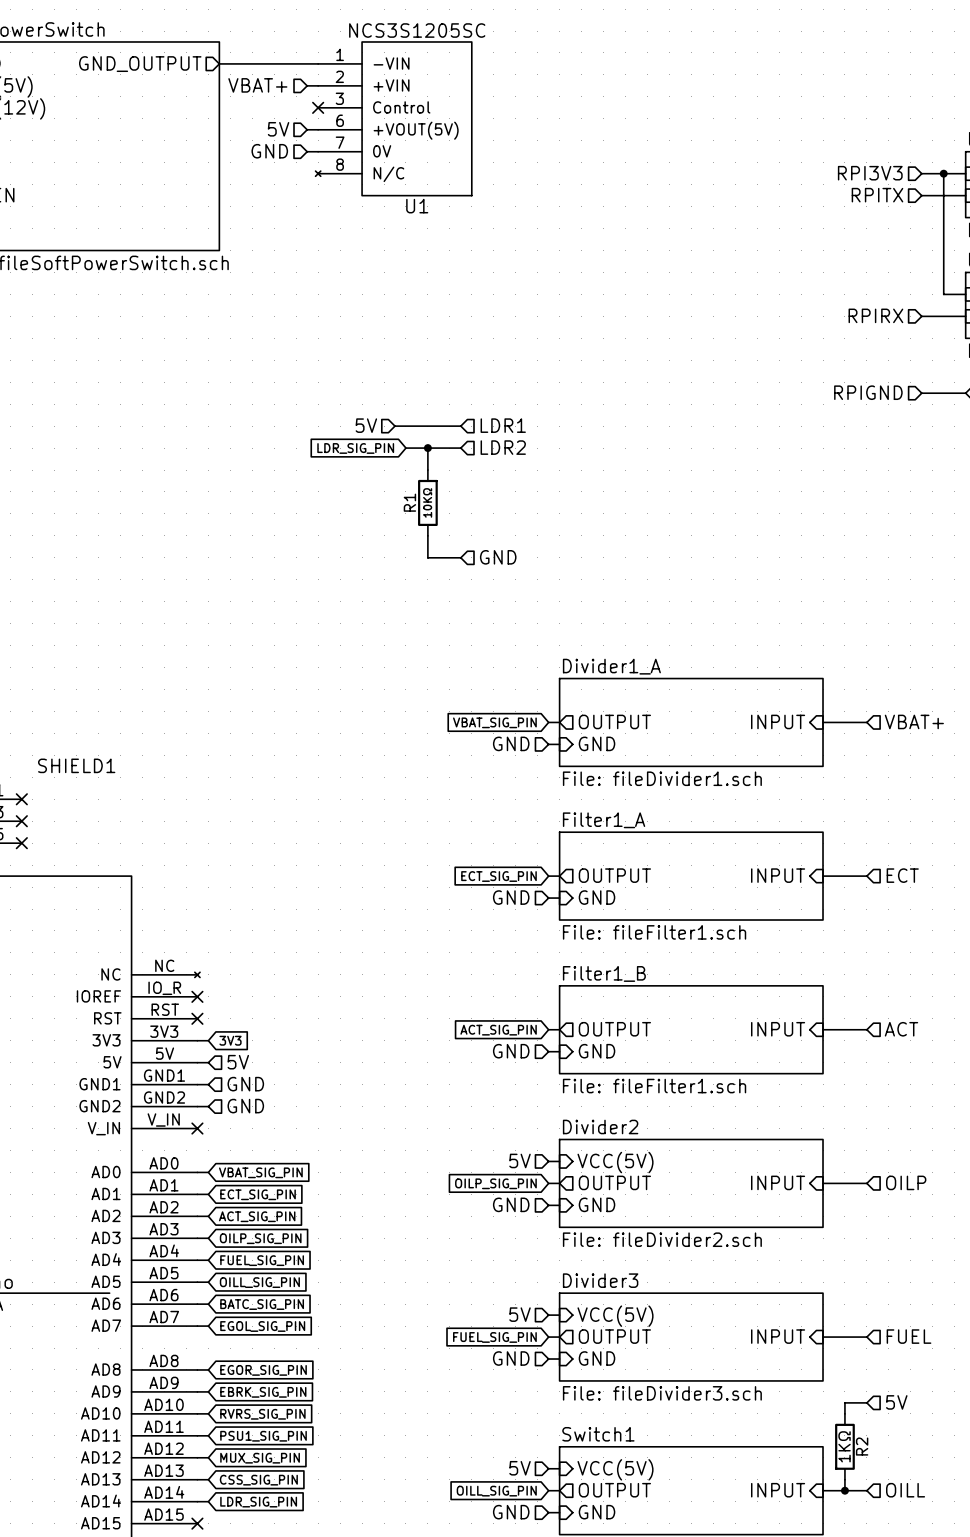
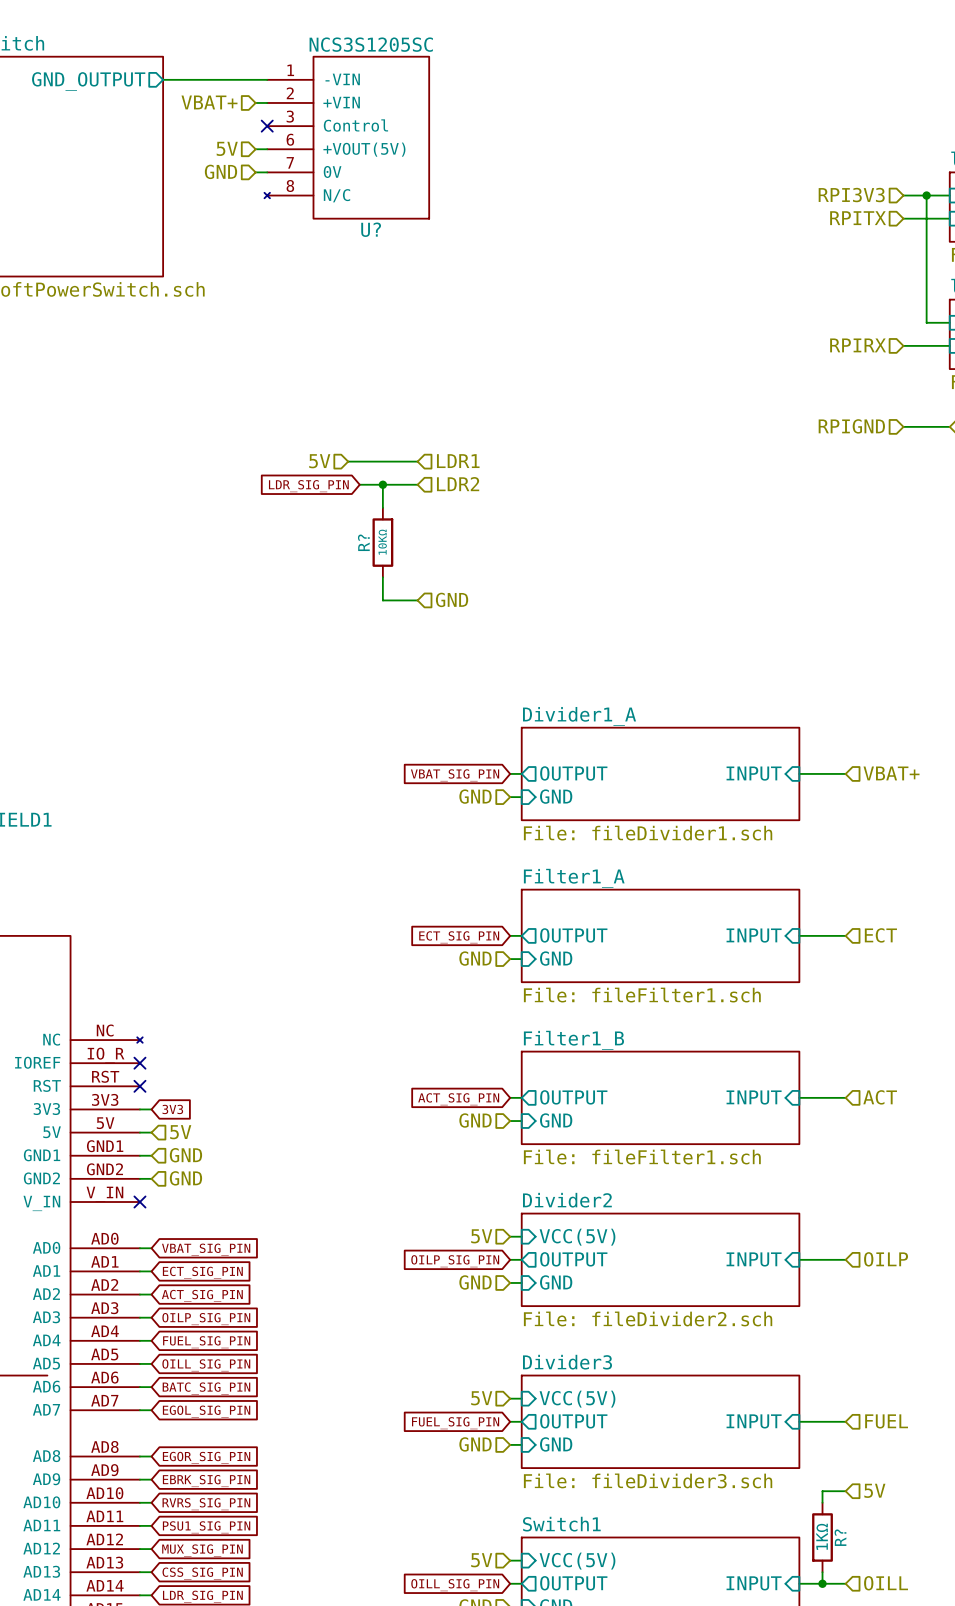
U1 name: U1 (417, 206) -> U? (371, 229)
R1 name: R1 (409, 502) -> R? (363, 542)
R2 name: R2 (862, 1446) -> R? (840, 1537)

